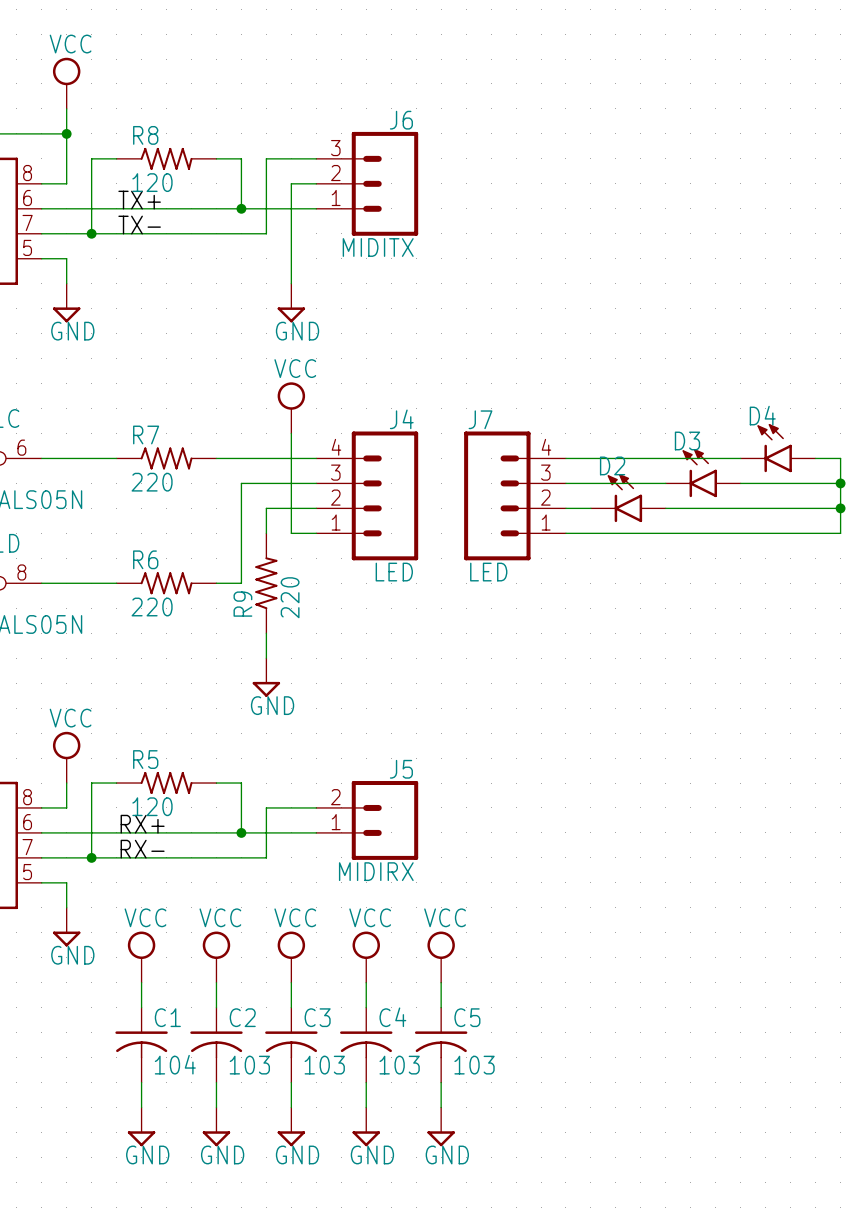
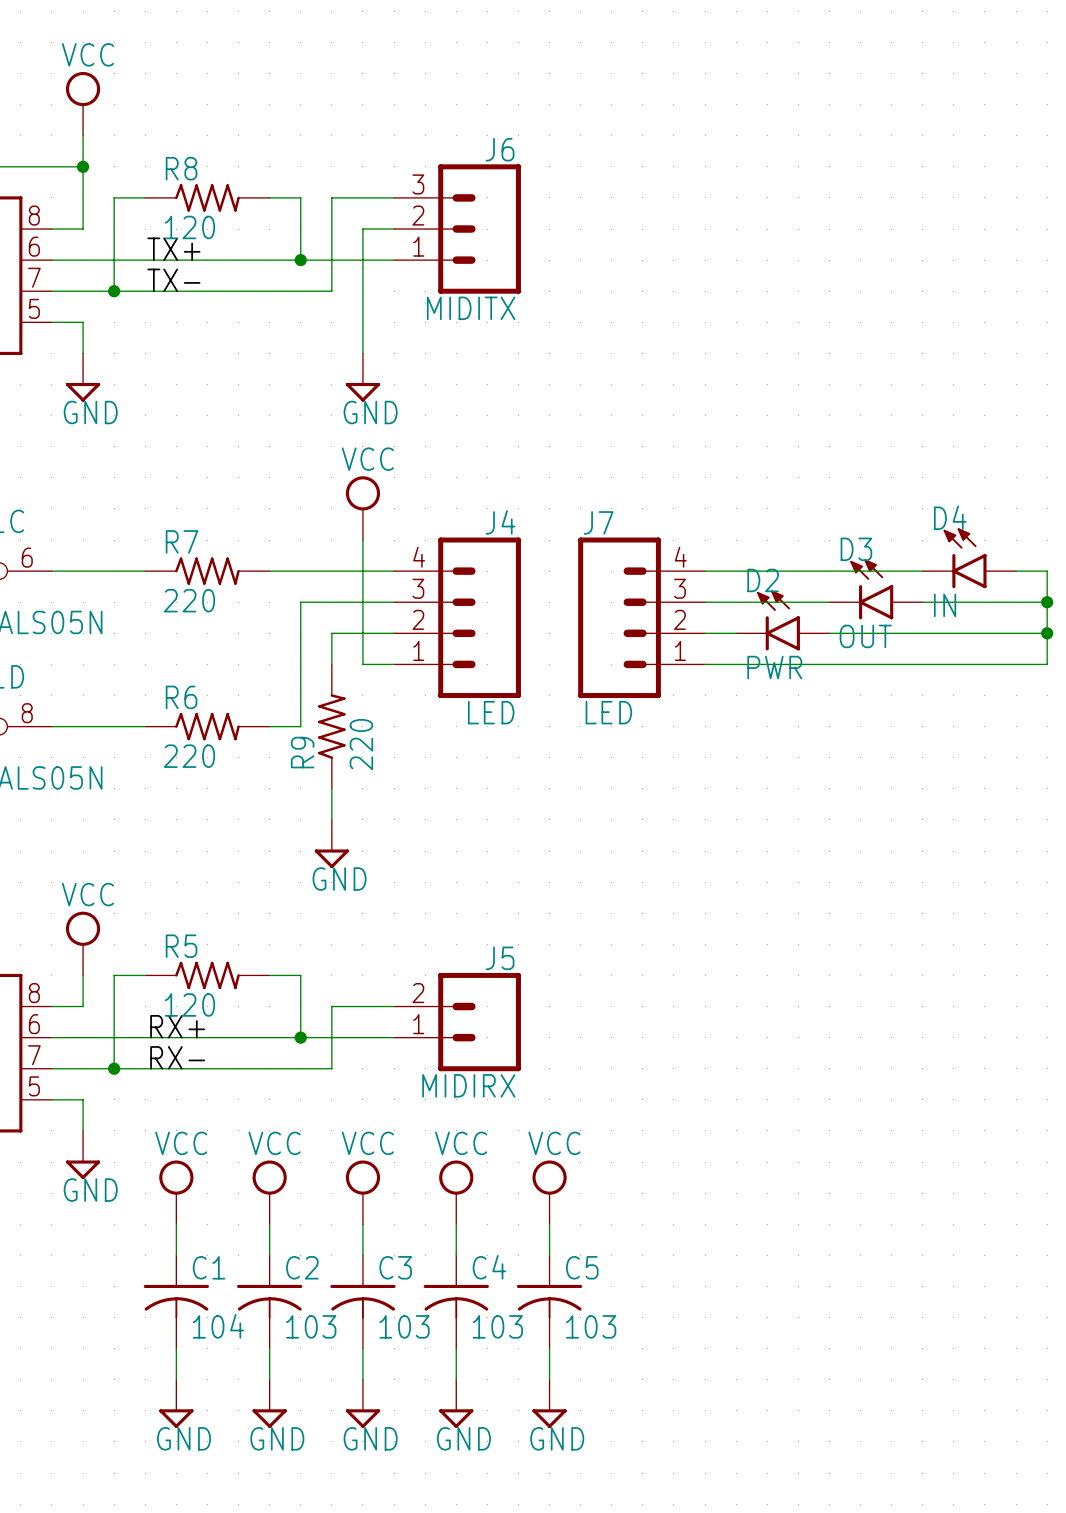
D4 value: none -> IN (945, 605)
D3 value: none -> OUT (865, 636)
D2 value: none -> PWR (774, 667)

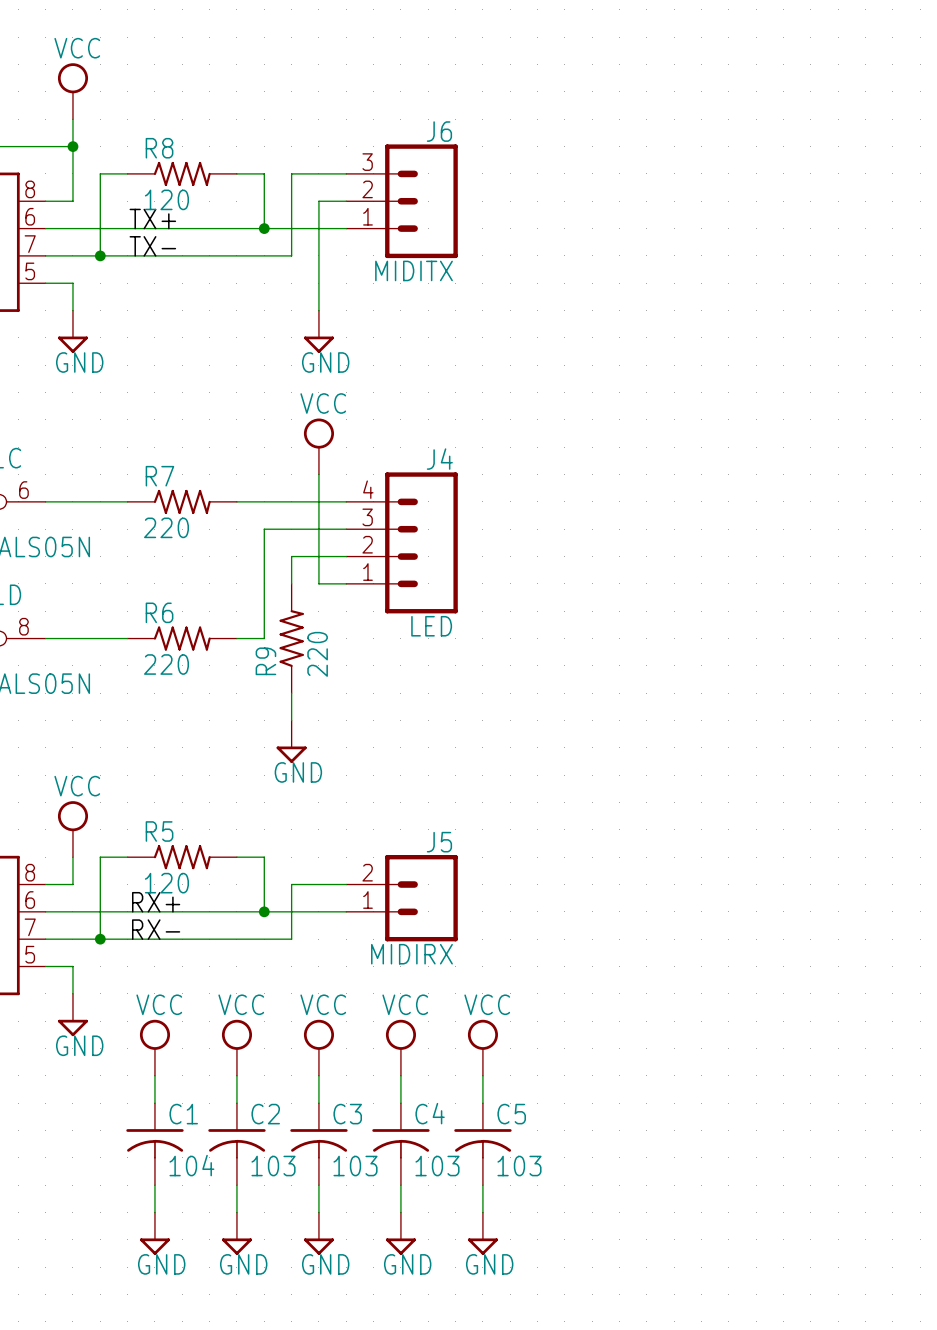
D4: IN (969, 558) -> none
wire: (705, 571) (922, 571) -> none
wire: (1016, 571) (1047, 571) (1047, 664) (705, 664) -> none
D3: OUT (876, 589) -> none
wire: (705, 602) (829, 602) -> none
wire: (922, 602) (1047, 602) -> none
junction: (1047, 602) -> none
J7: LED (641, 617) -> none
D2: PWR (782, 620) -> none
wire: (705, 633) (736, 633) -> none
wire: (829, 633) (1047, 633) -> none
junction: (1047, 633) -> none

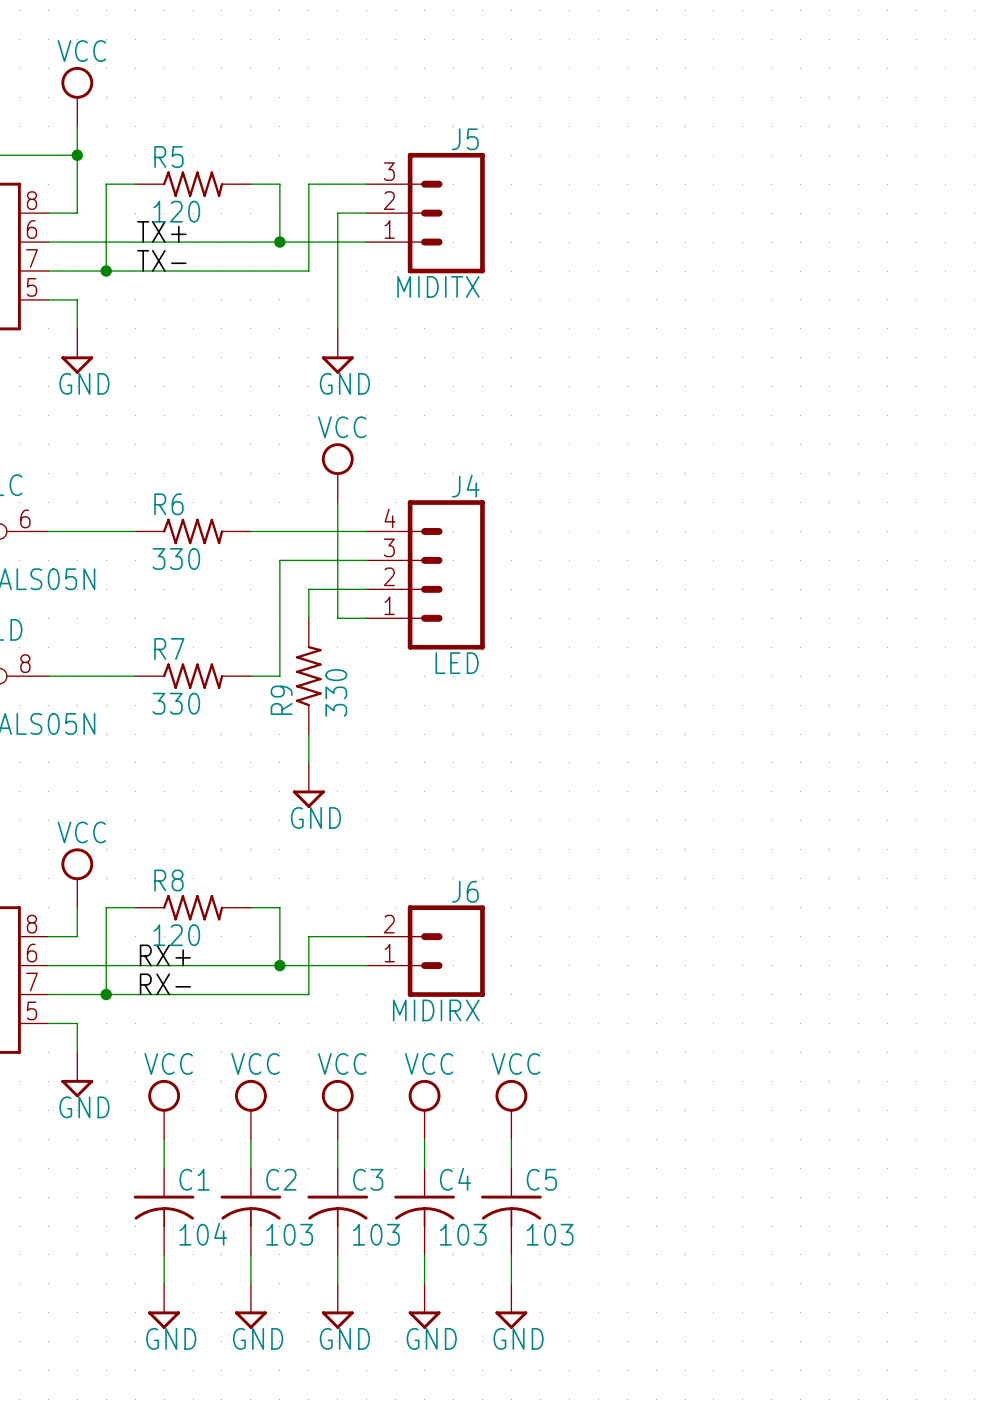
J6 name: J6 (439, 131) -> J5 (465, 139)
R8 name: R8 (159, 148) -> R5 (168, 156)
R7 name: R7 (159, 476) -> R6 (168, 504)
R7 value: 220 (166, 527) -> 330 (176, 558)
R6 name: R6 (159, 612) -> R7 (169, 648)
R9 value: 220 (317, 654) -> 330 (336, 692)
R6 value: 220 (166, 664) -> 330 (176, 703)
R5 name: R5 (159, 831) -> R8 (168, 880)
J5 name: J5 (439, 842) -> J6 (465, 891)

